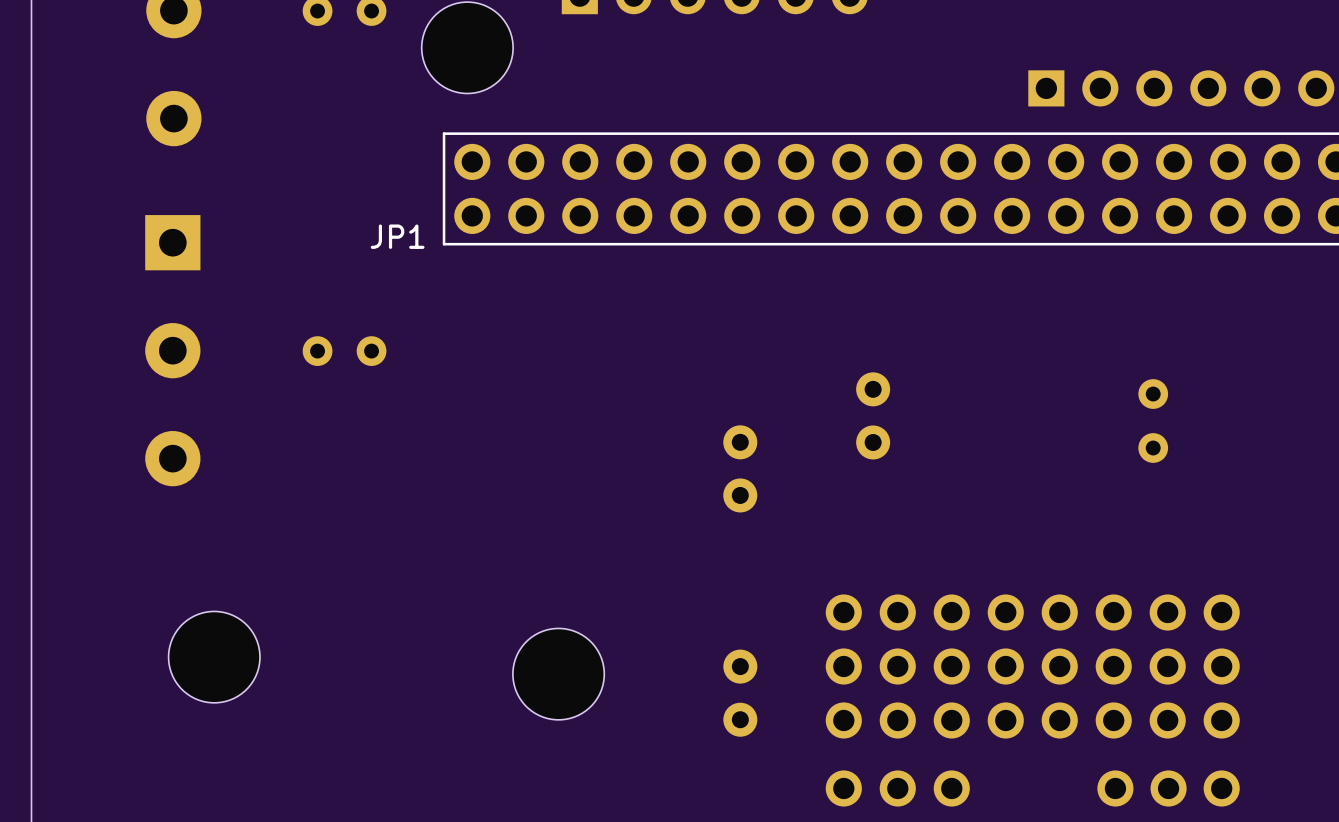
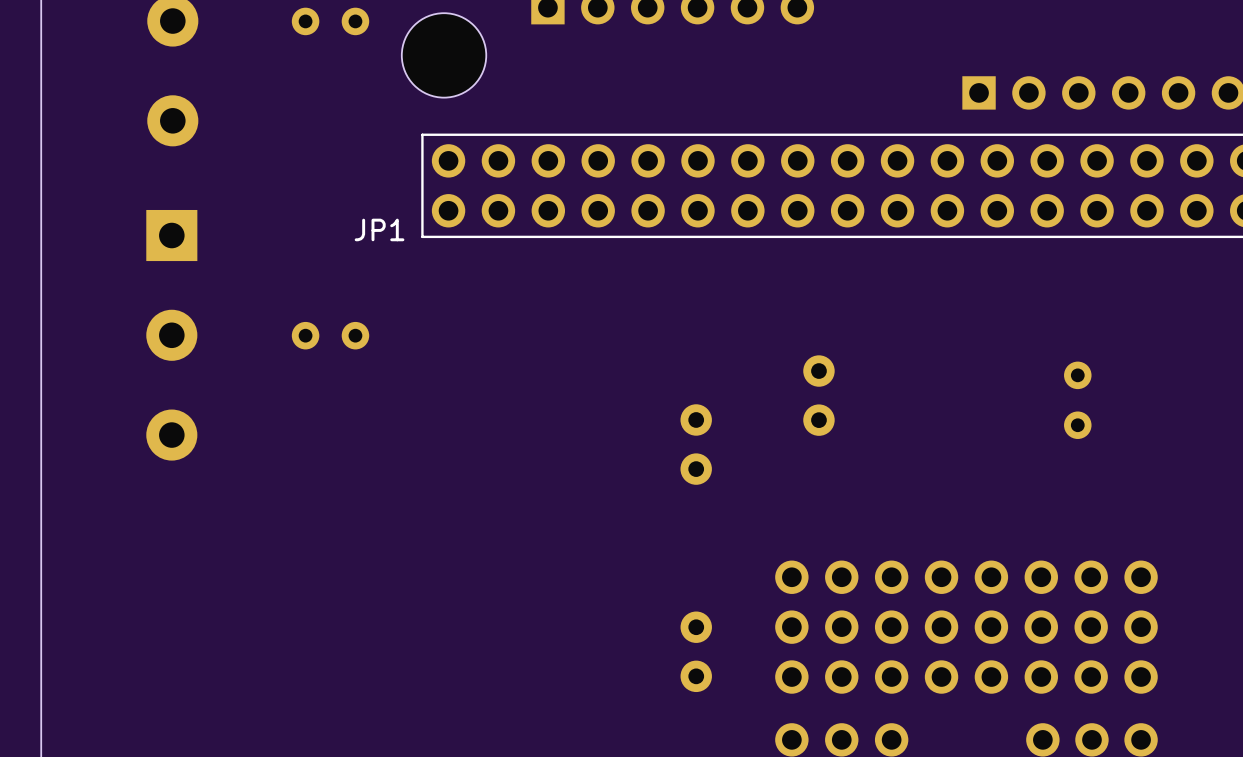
part: (214, 657) -> none
part: (558, 674) -> none

